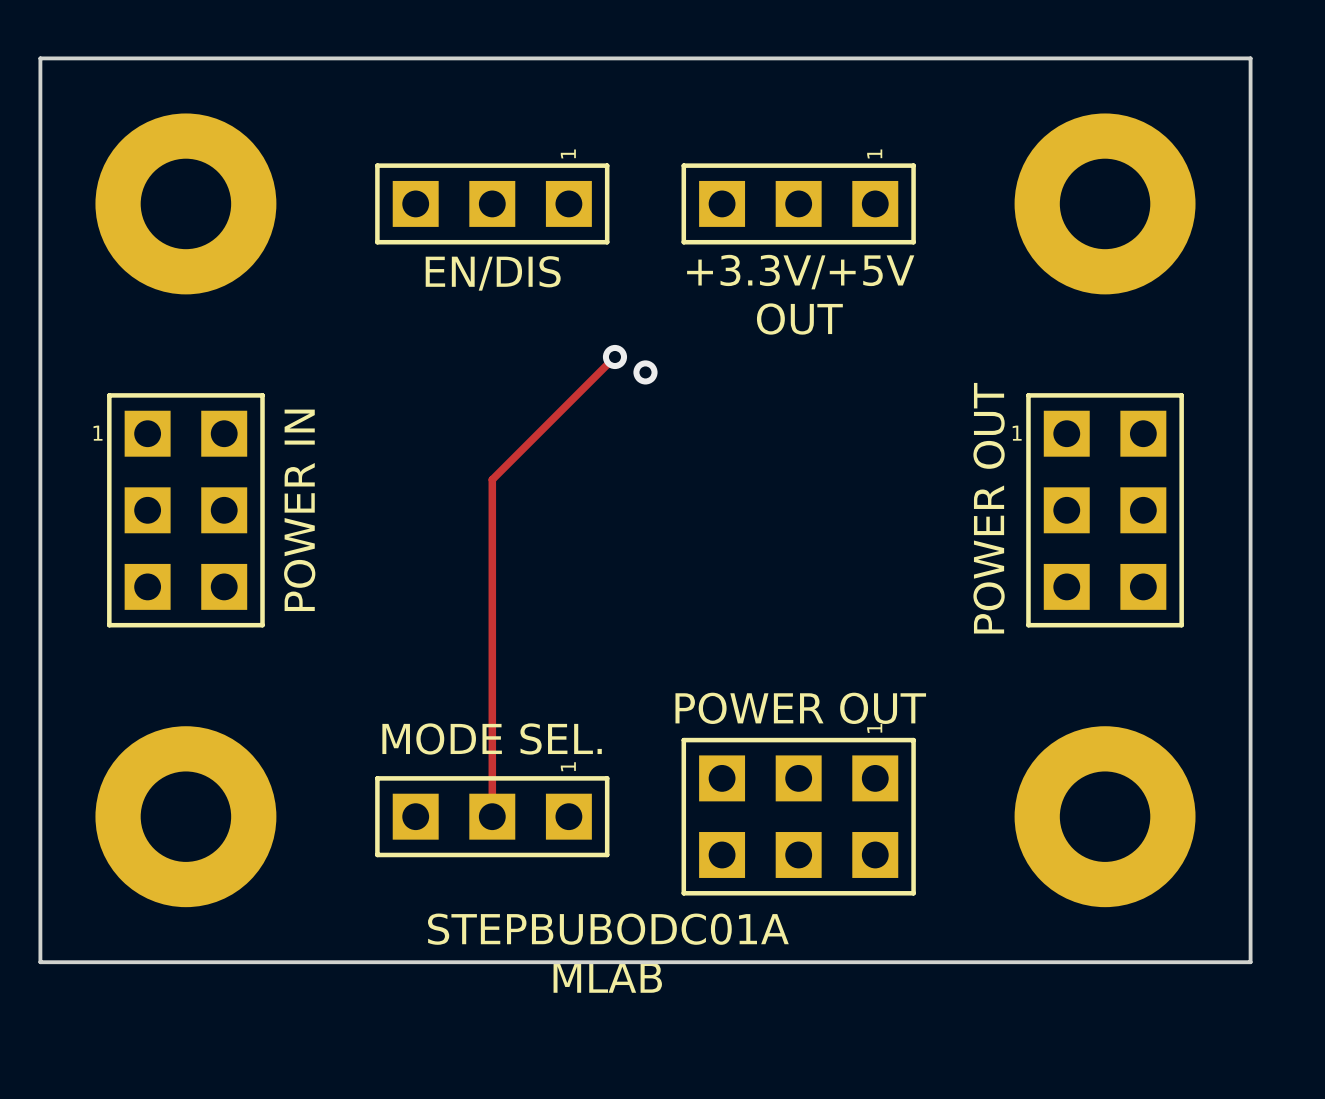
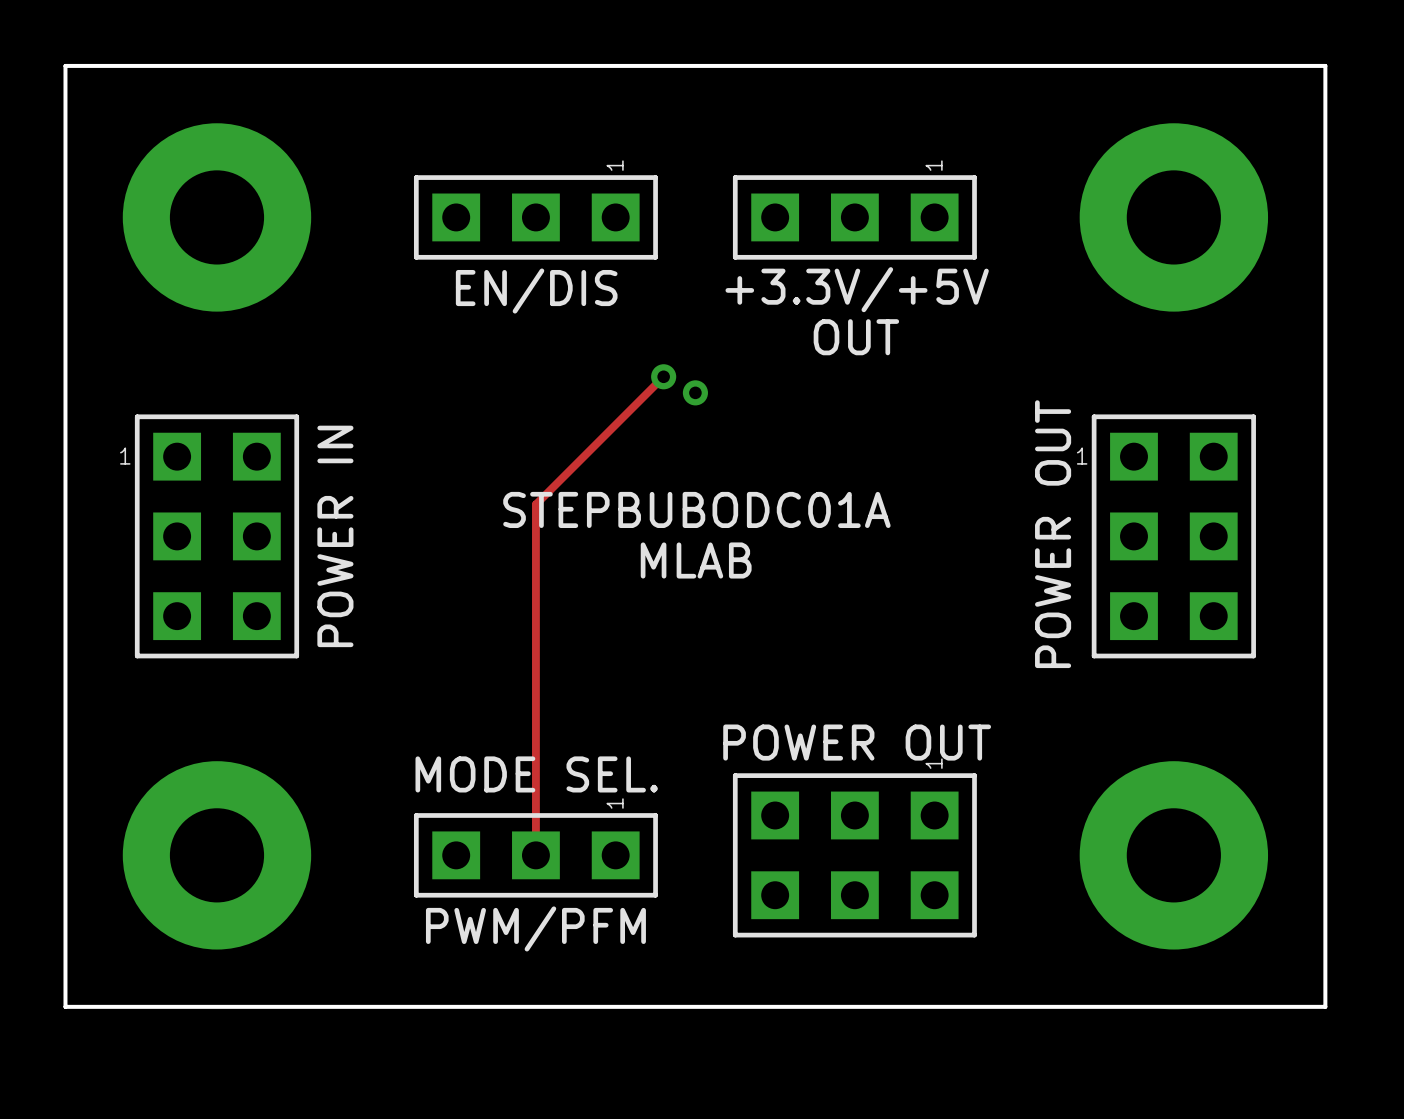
text: none -> PWM/PFM (535, 928)
text position: STEPBUBODC01A (608, 929) -> STEPBUBODC01A (696, 509)
text position: MLAB (607, 977) -> MLAB (696, 560)

